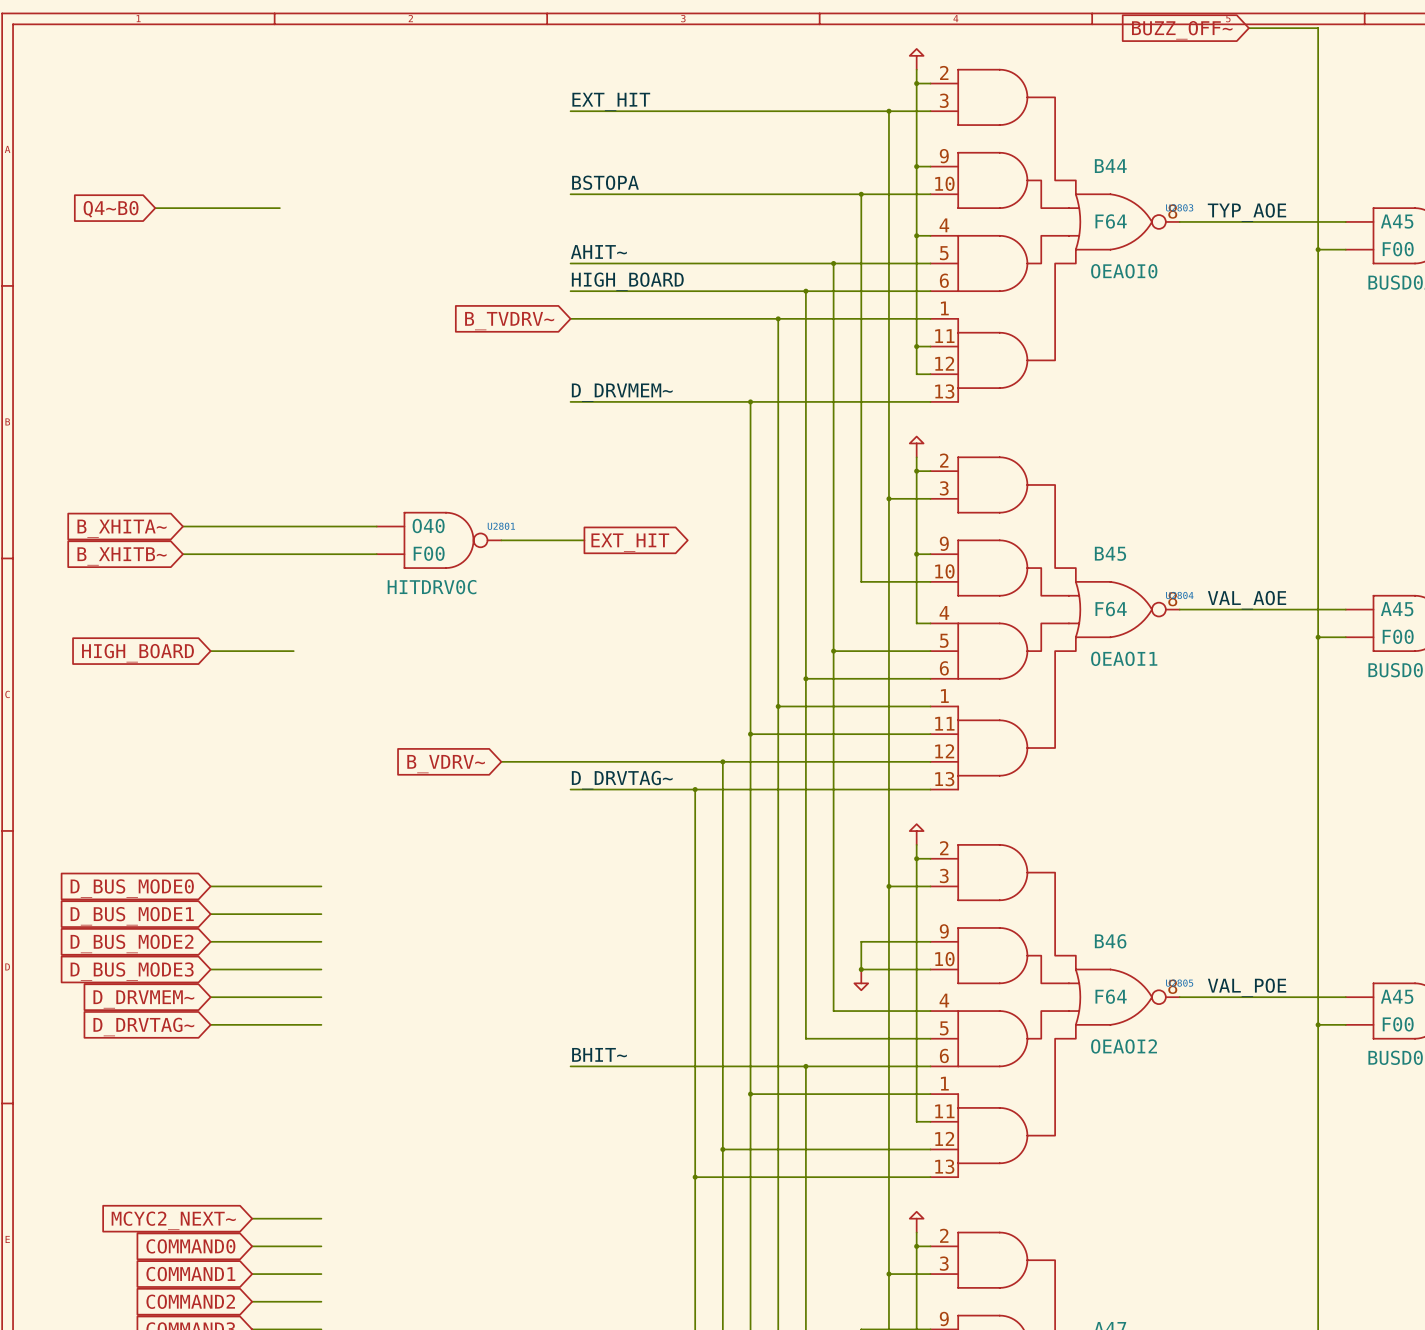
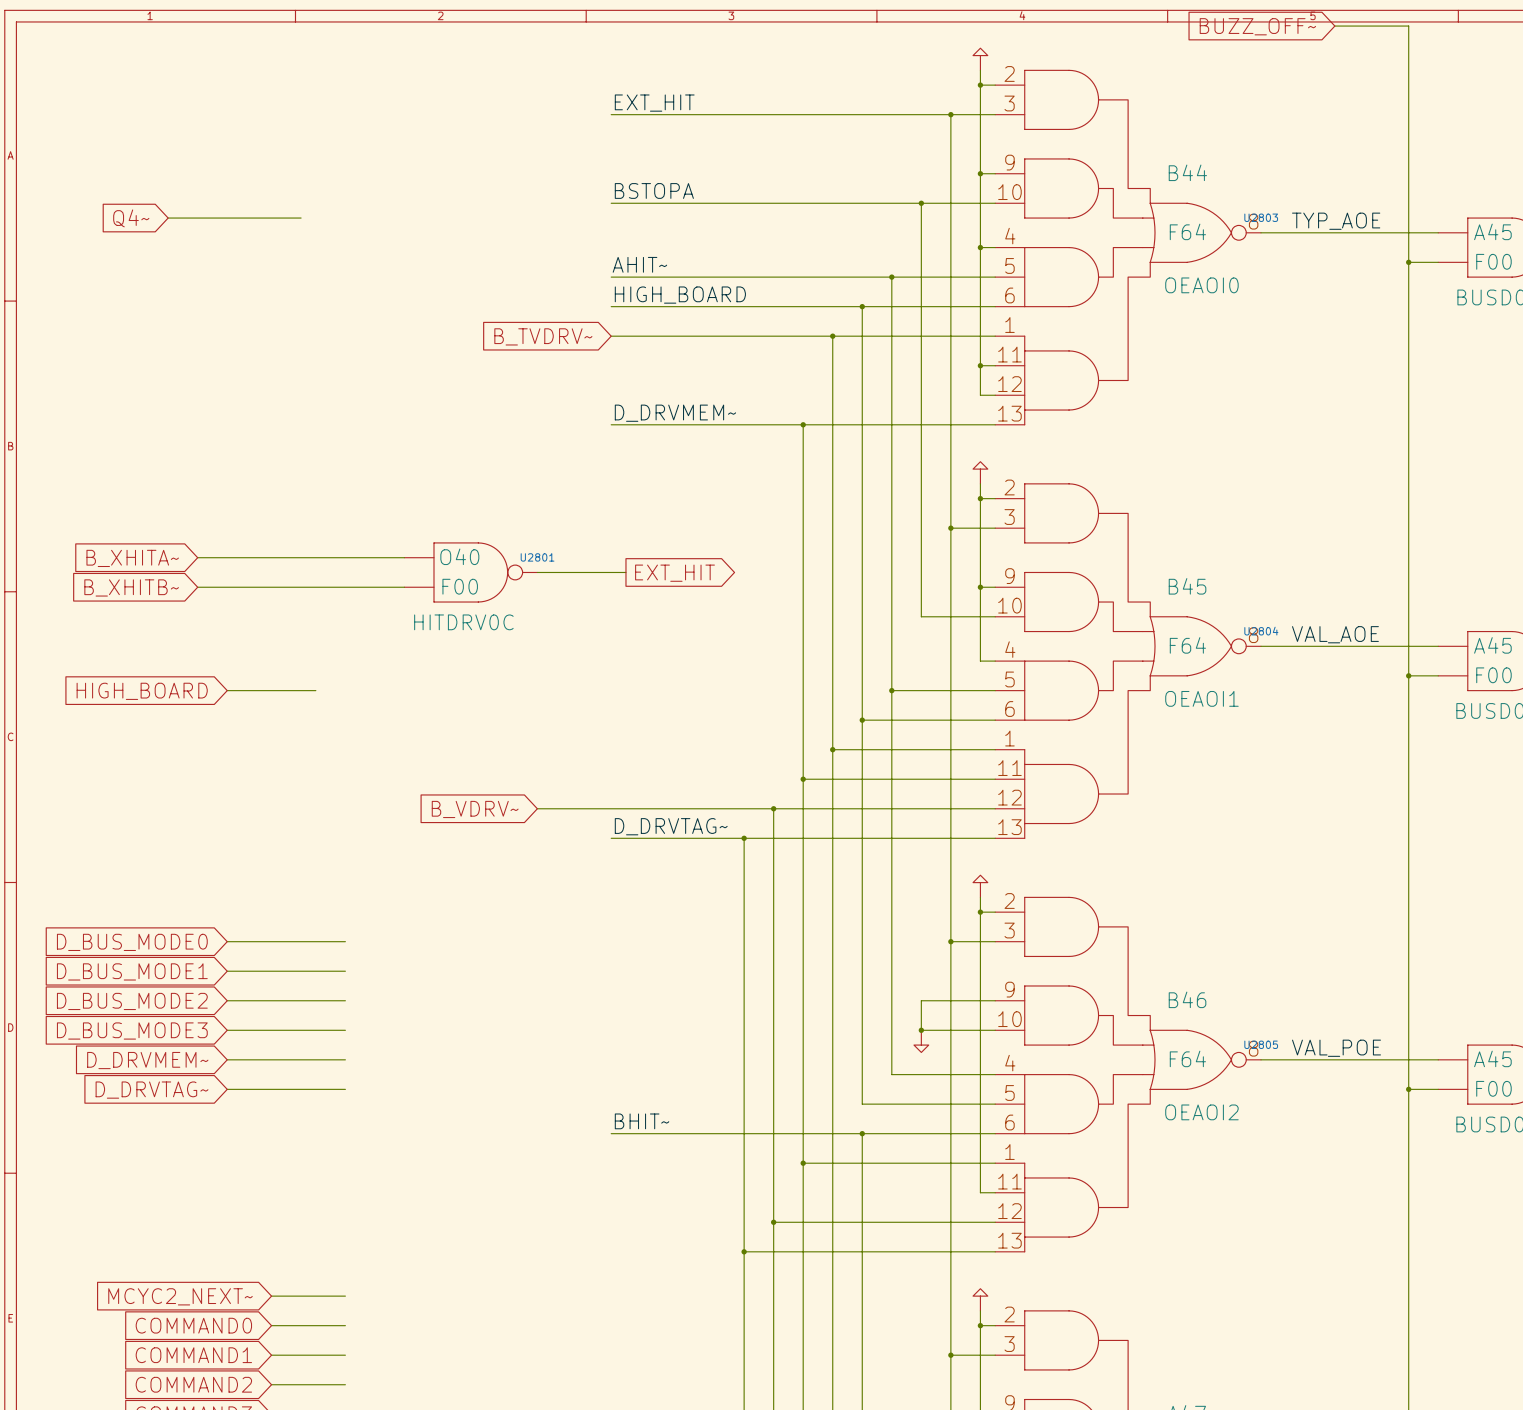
global label: Q4~B0 (111, 209) -> Q4~ (131, 218)

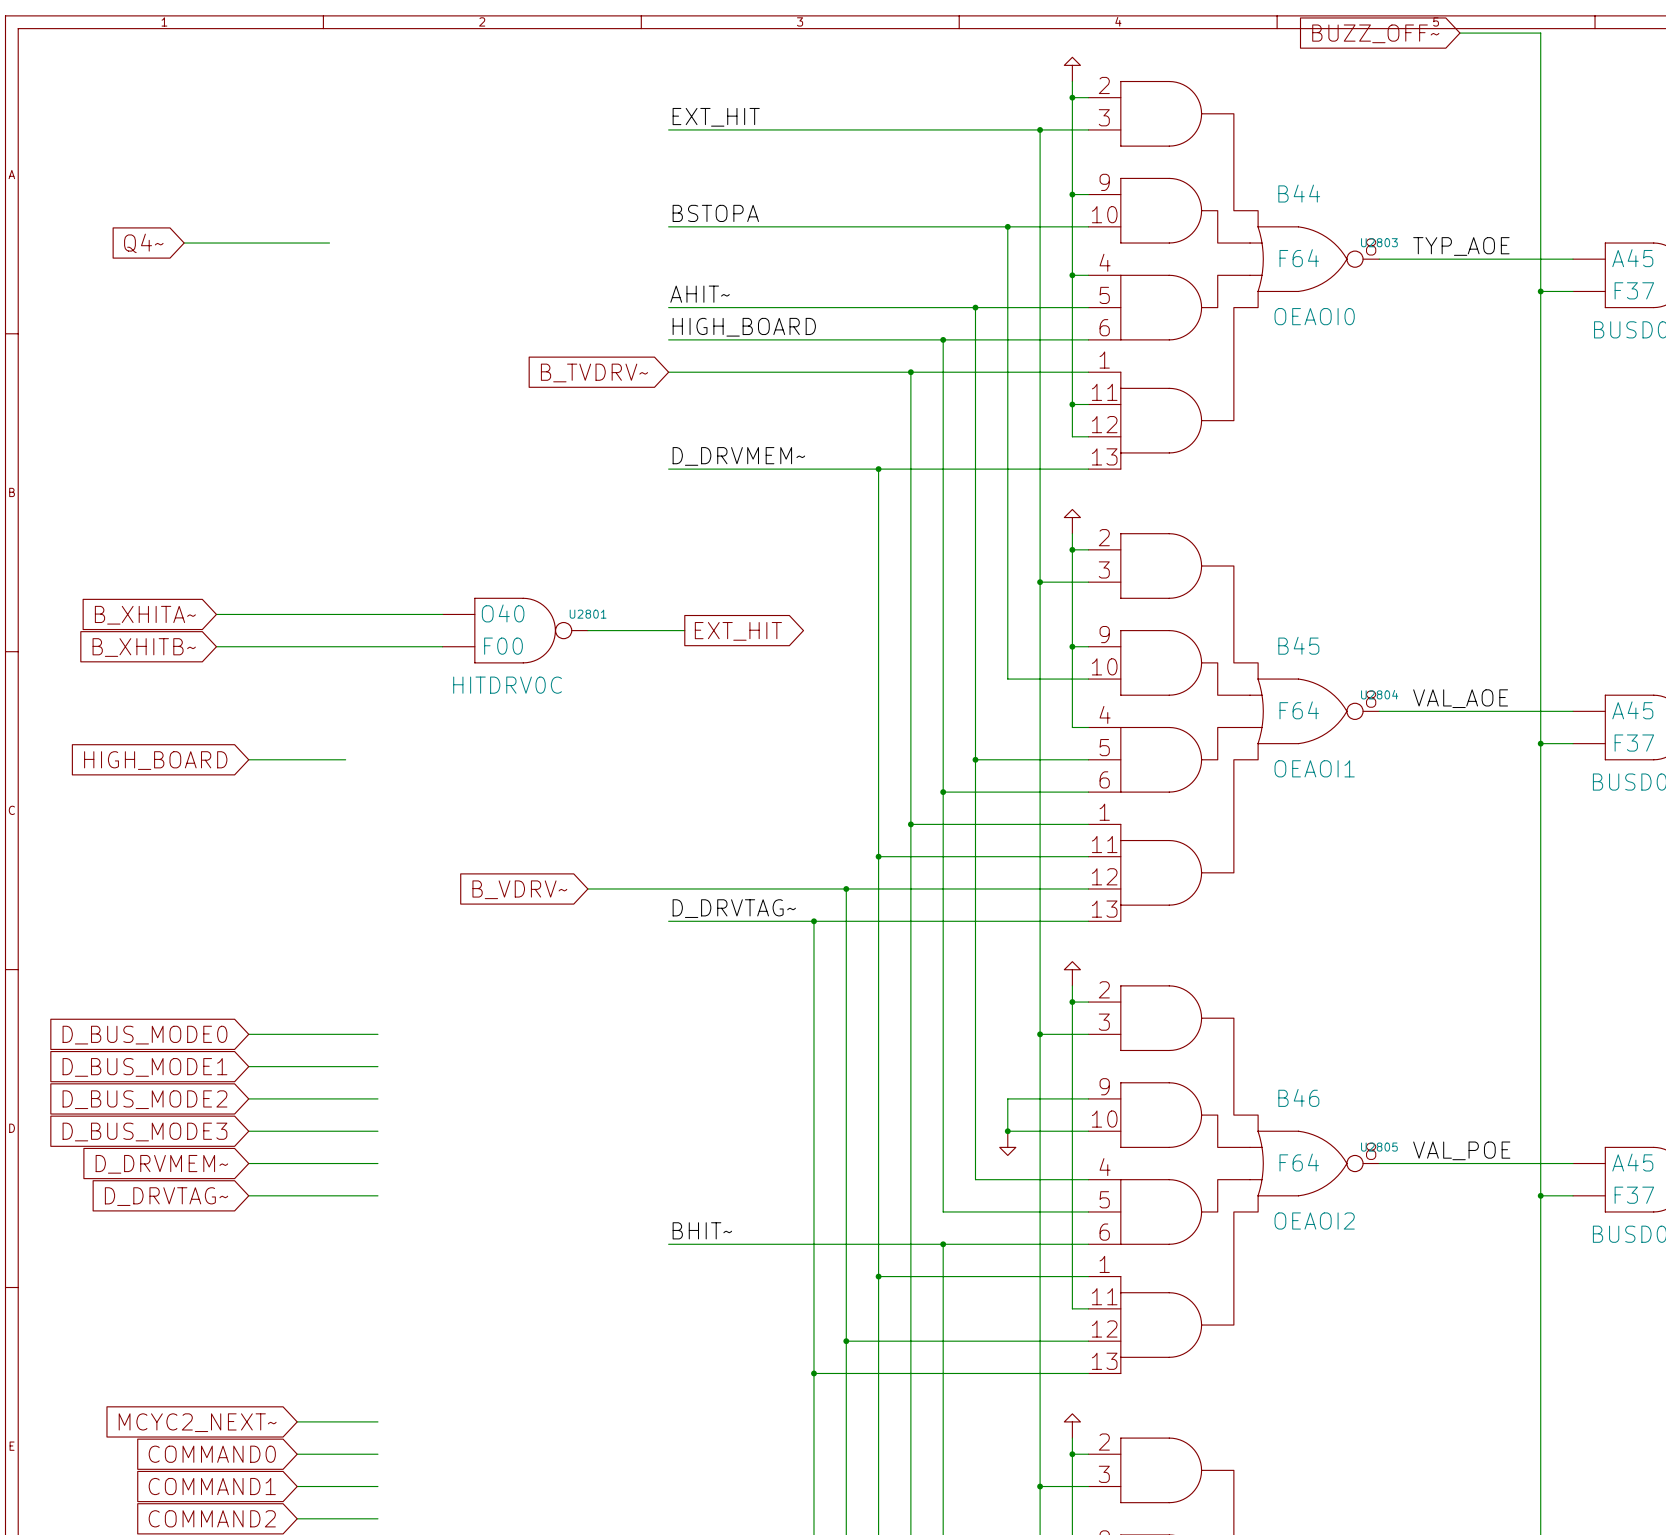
part value: F00 (1493, 261) -> F37 (1634, 290)
part value: F00 (1493, 675) -> F37 (1634, 743)
part value: F00 (1493, 1088) -> F37 (1634, 1195)

